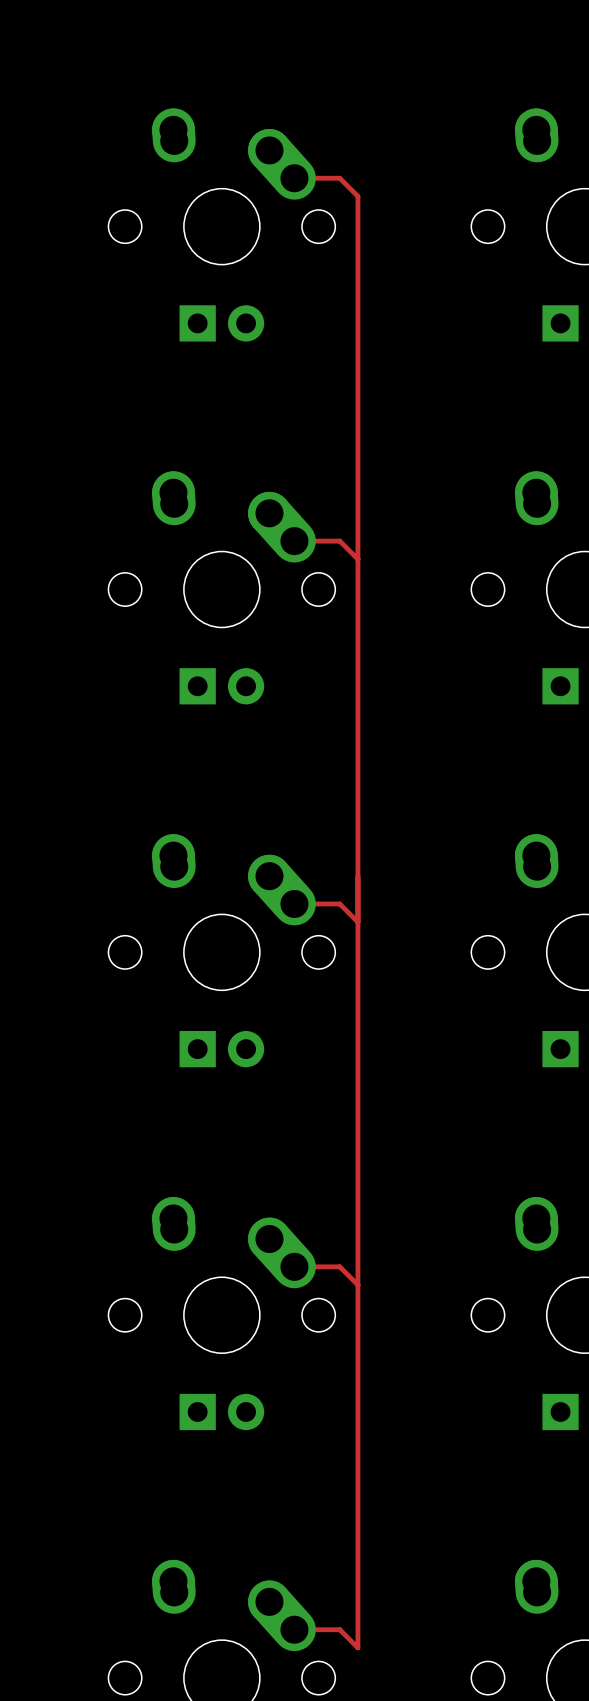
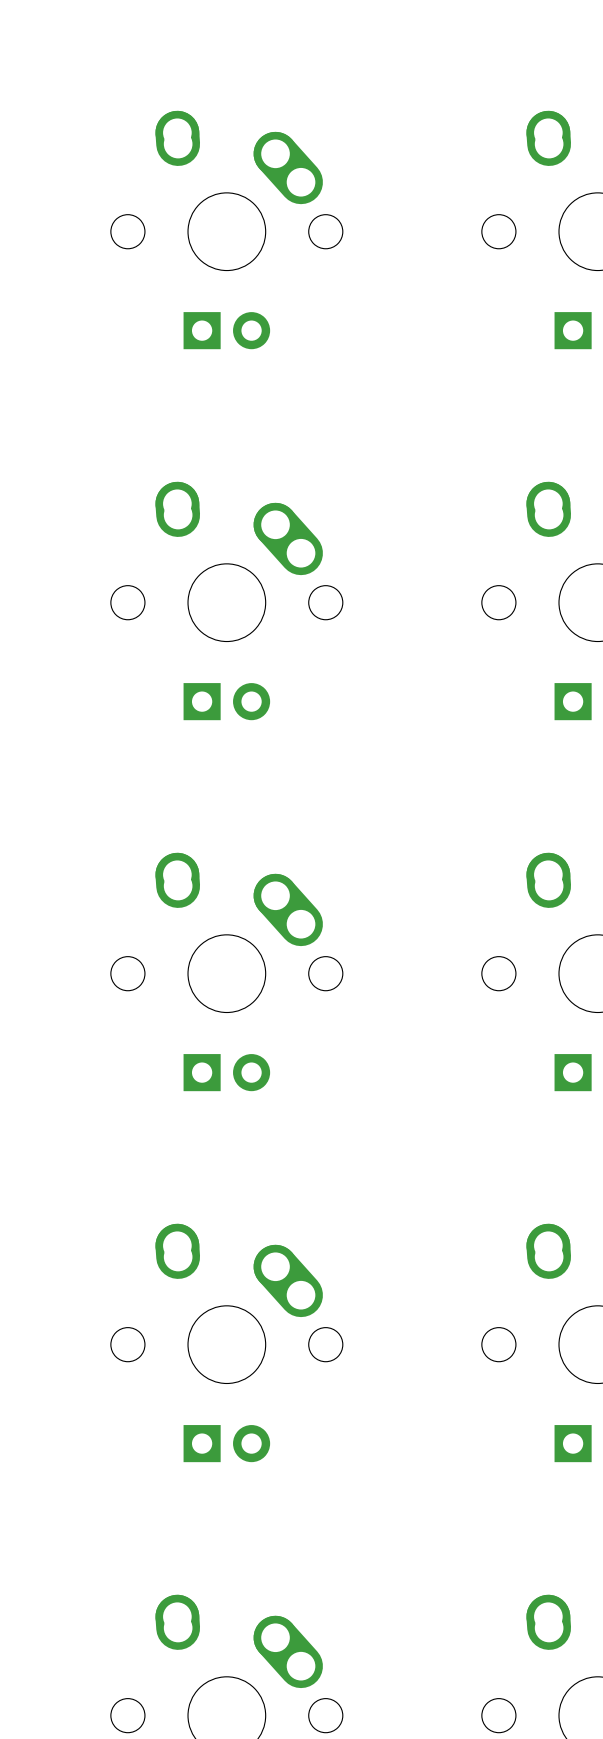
top track: (294, 178) (339, 178) (357, 196) (357, 1647) (339, 1629) (294, 1629) -> none
top track: (294, 541) (339, 541) (357, 559) -> none
top track: (294, 903) (339, 903) (357, 922) -> none
top track: (294, 1266) (339, 1266) (357, 1284) -> none

